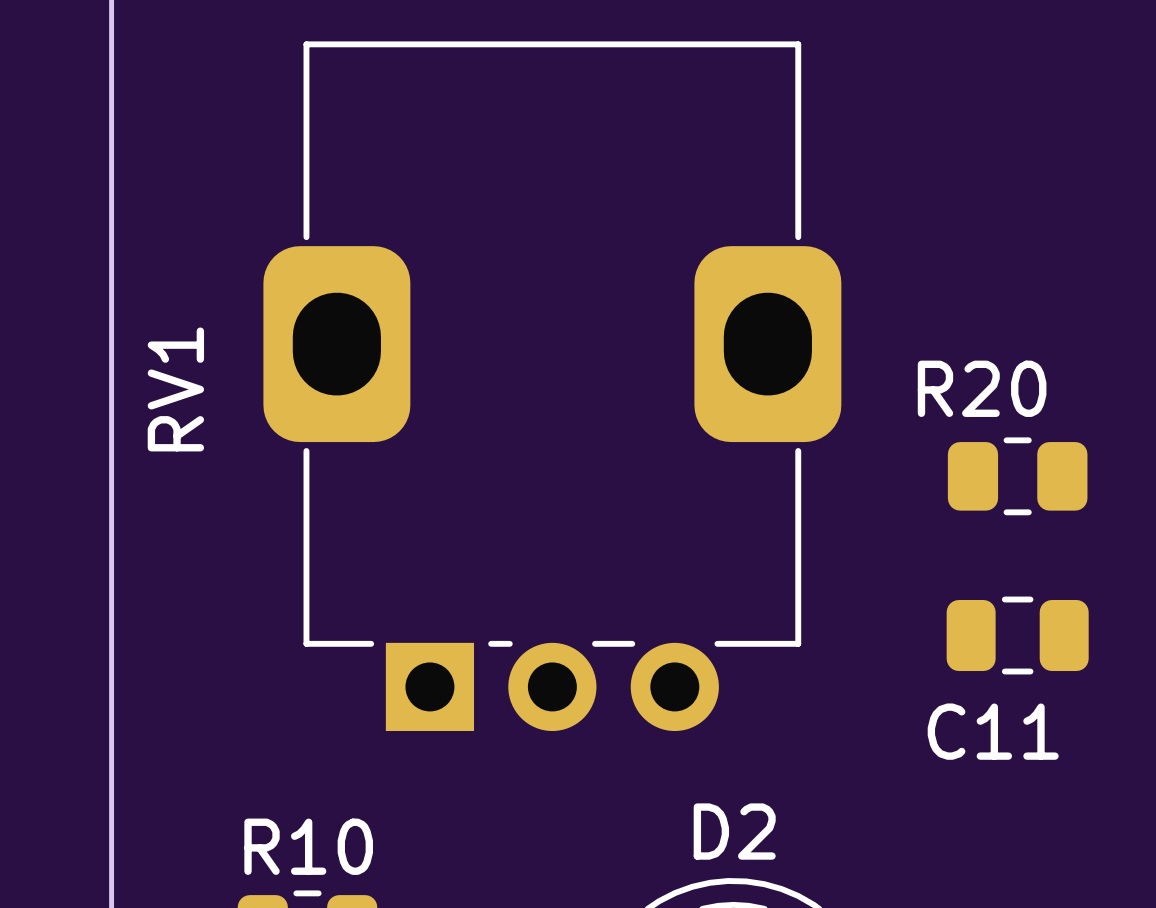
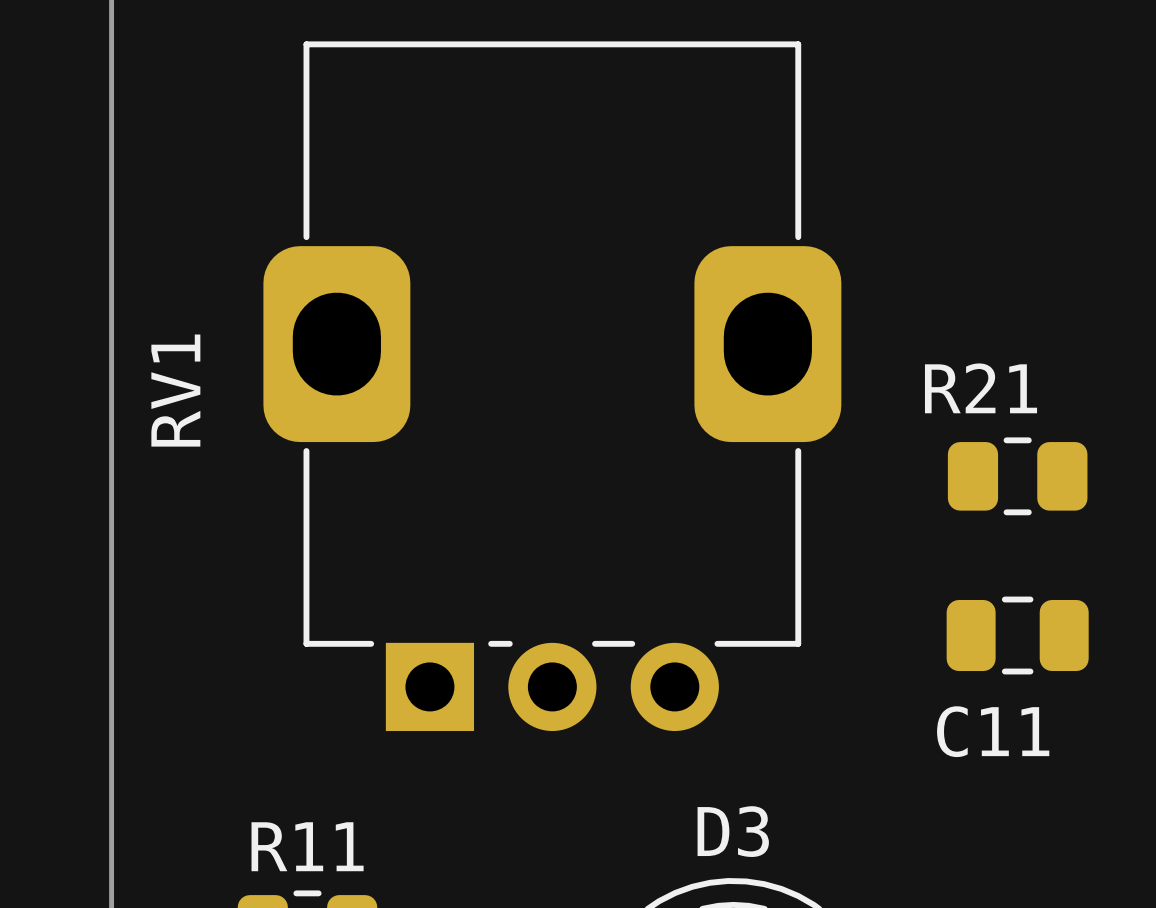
R20 name: R20 (982, 388) -> R21 (981, 388)
D2 name: D2 (734, 831) -> D3 (733, 831)
R10 name: R10 (308, 846) -> R11 (307, 846)

